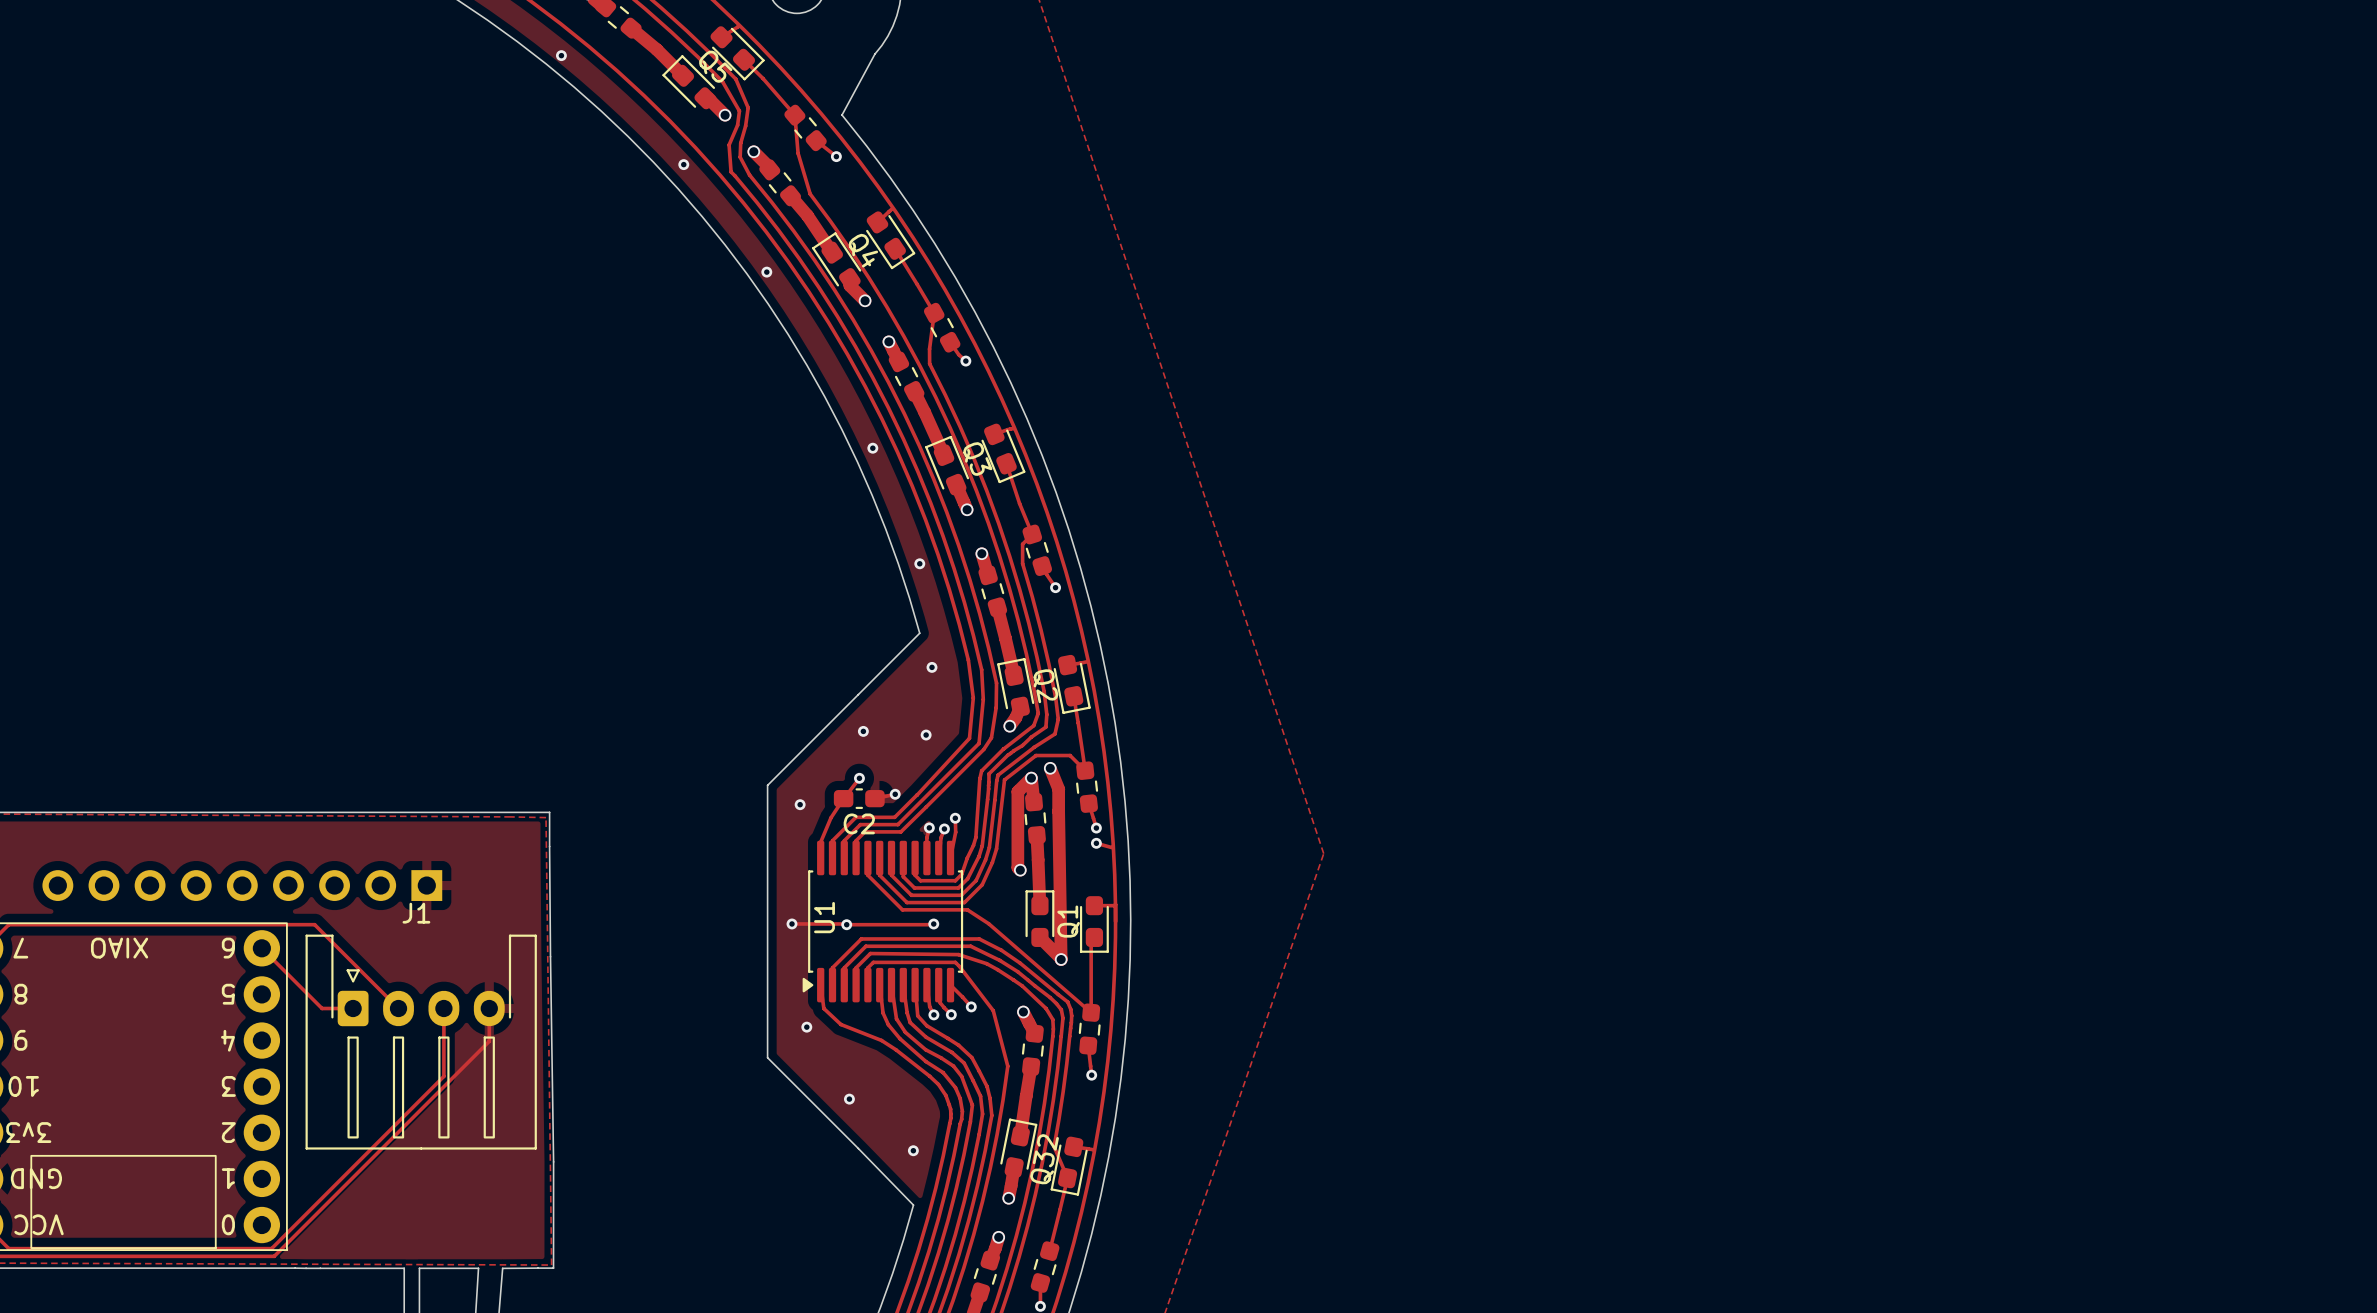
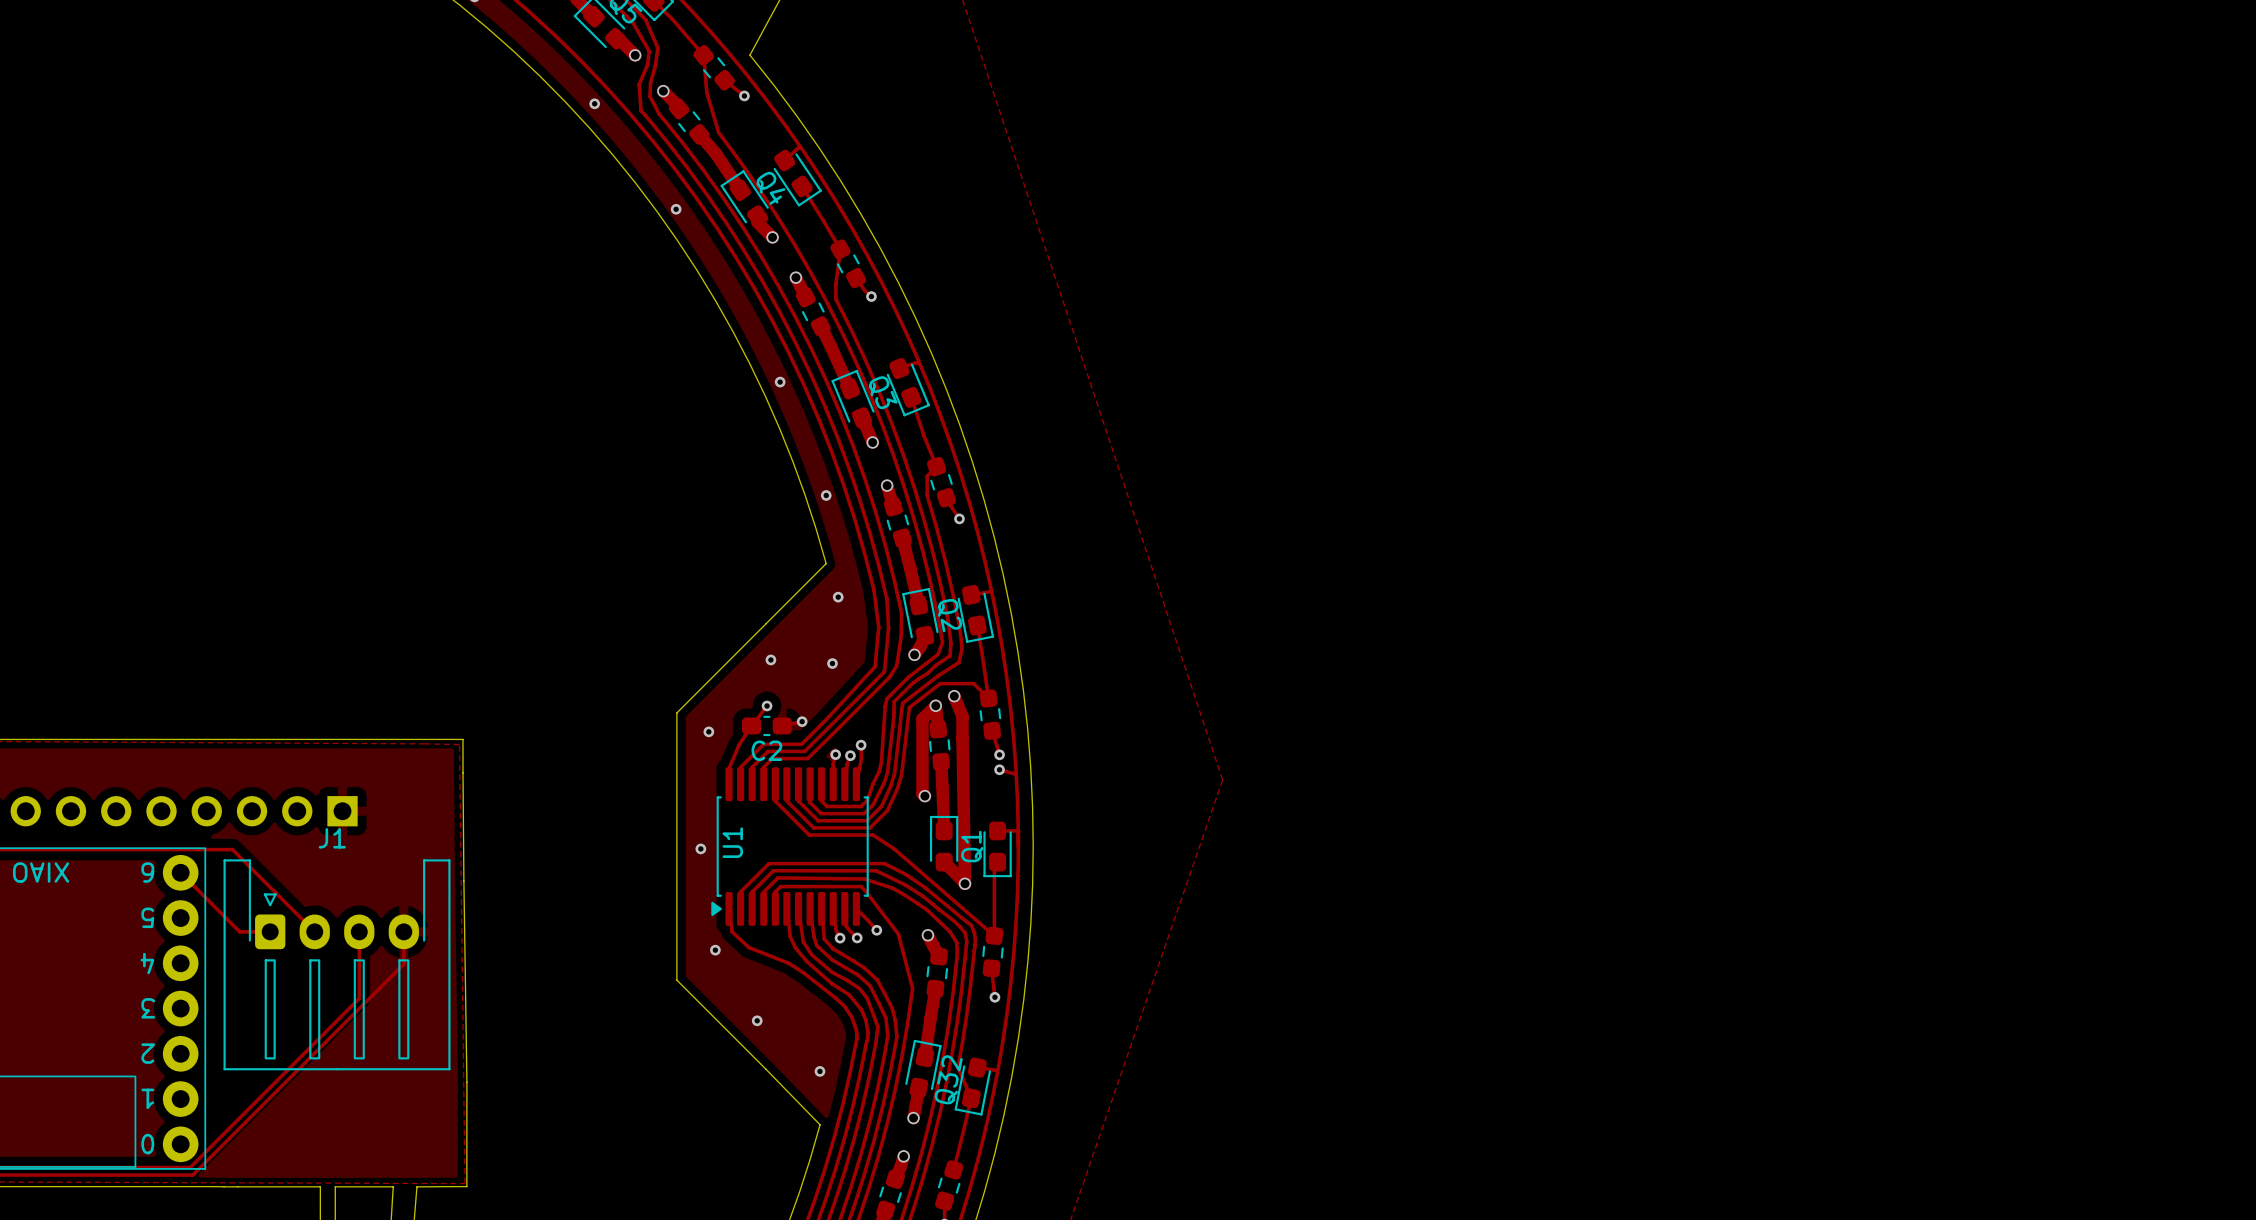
track: (791, 923) (933, 924) -> none
via: (846, 924) -> none
via: (933, 924) -> none

